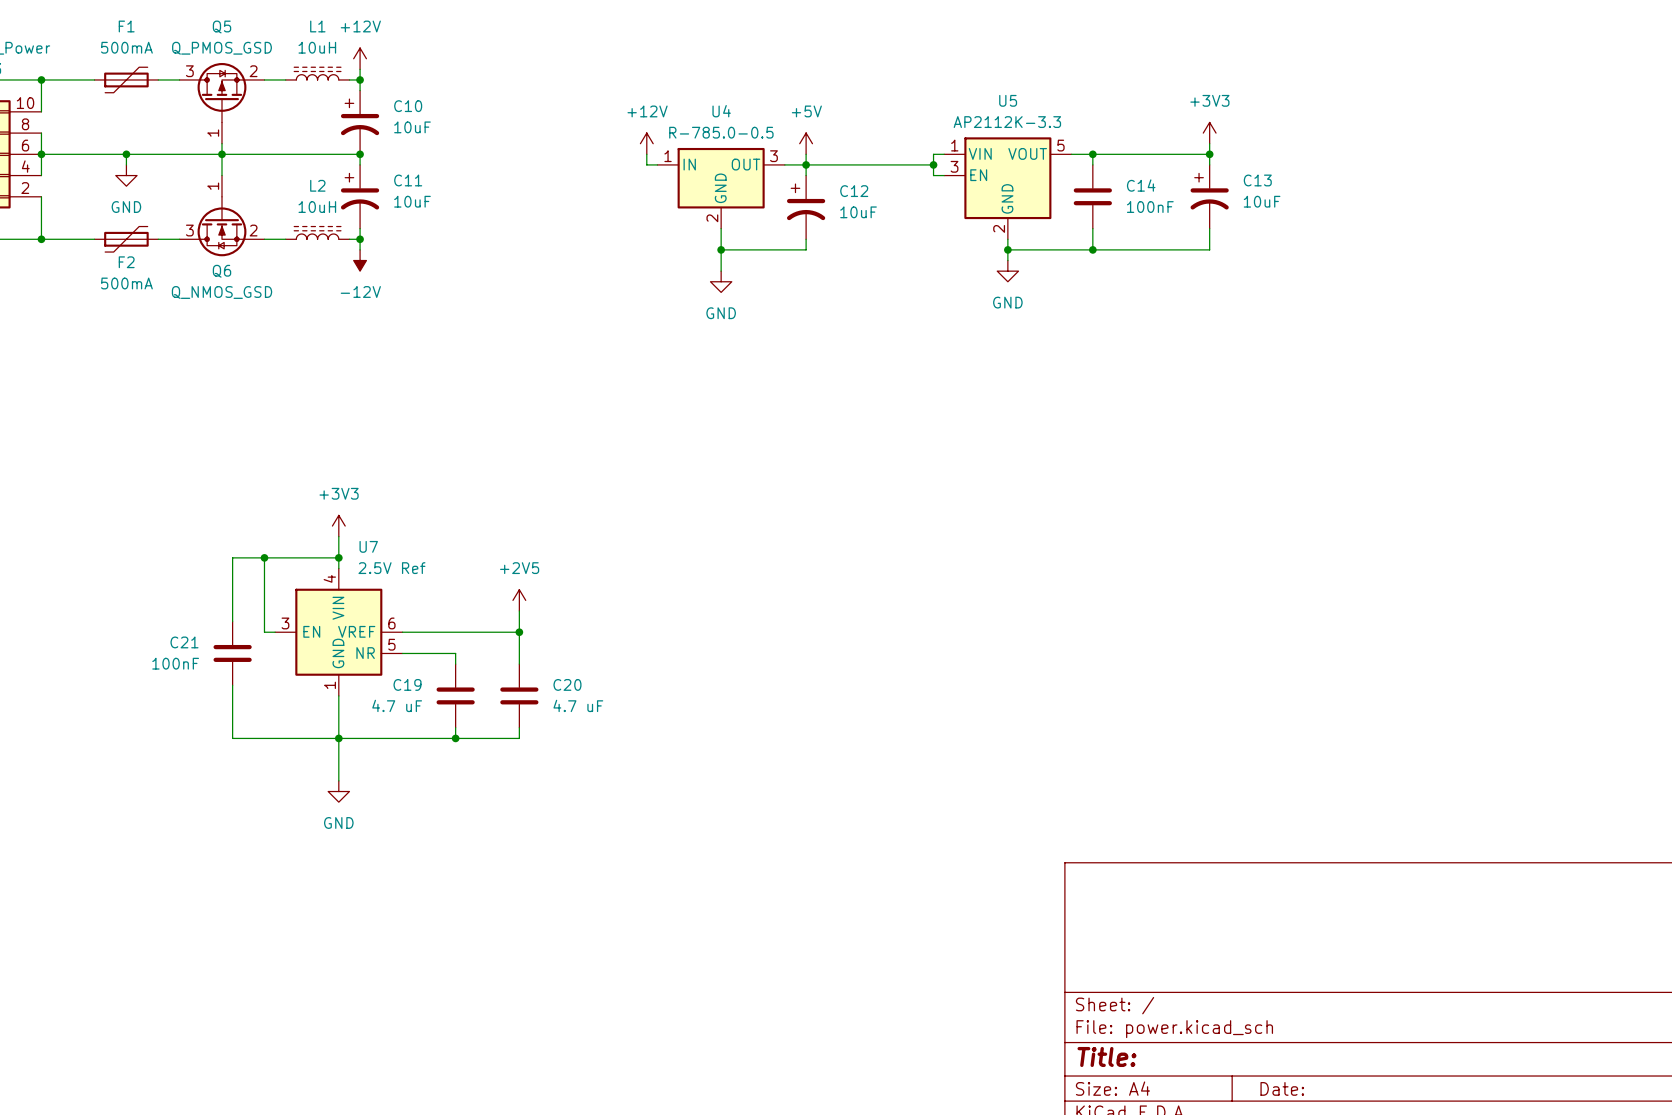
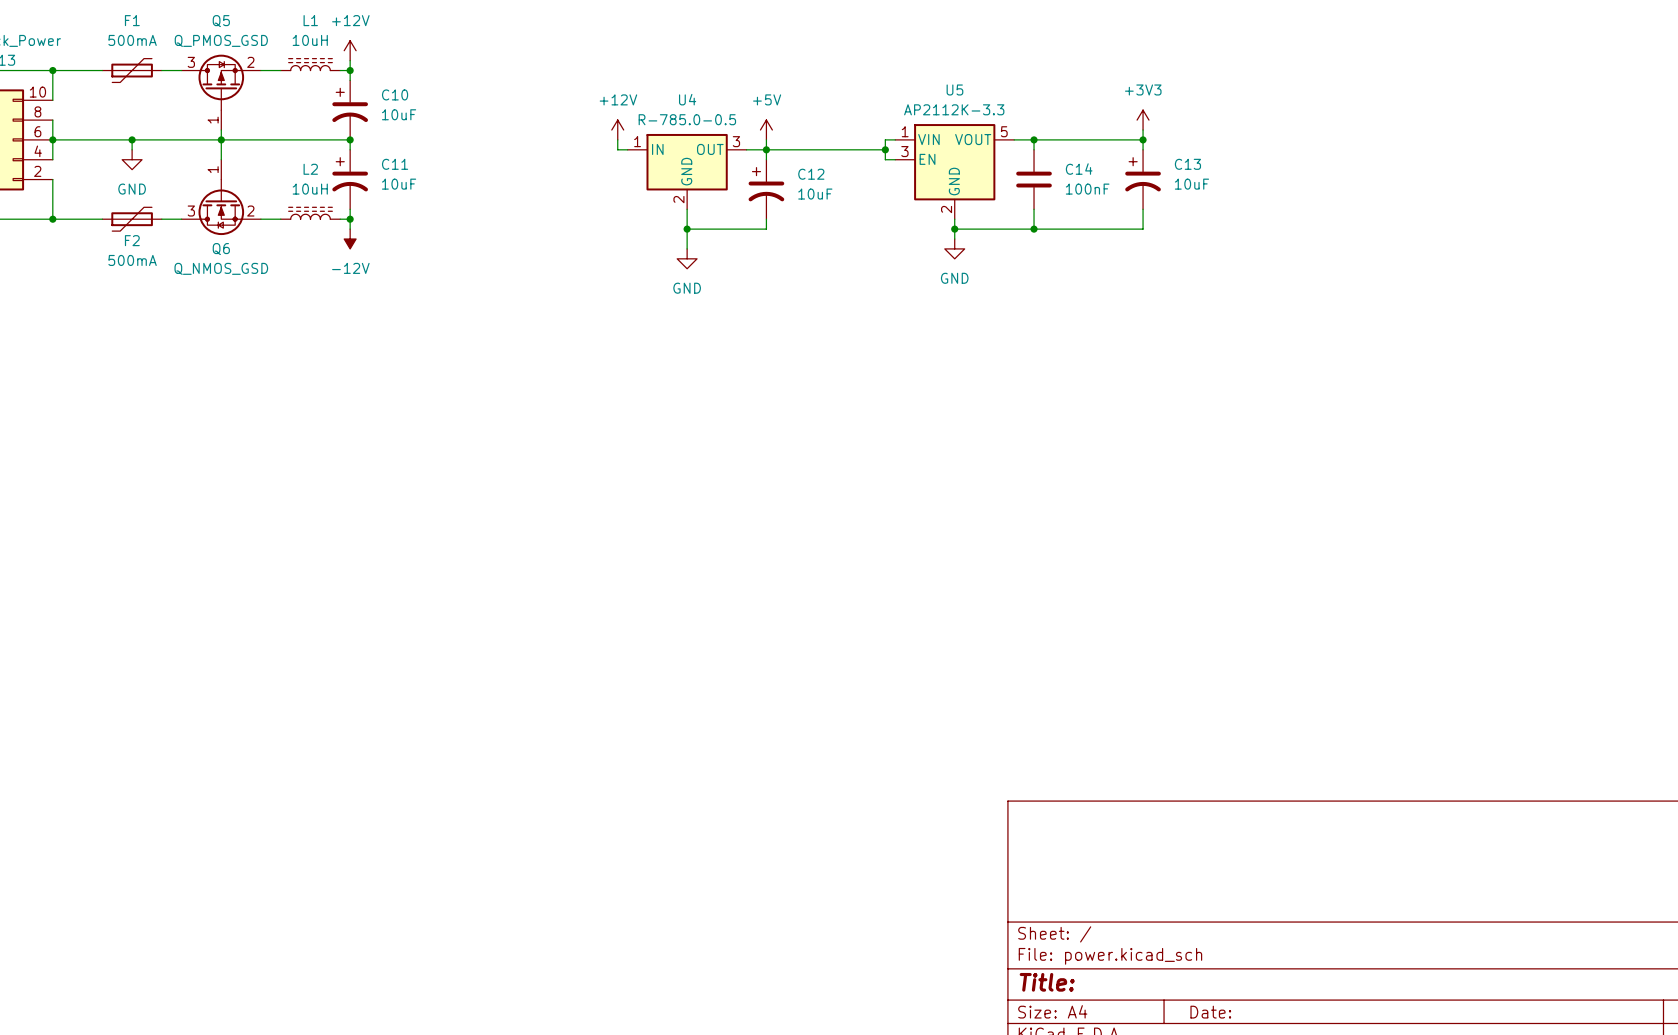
power symbol: +3V3 (338, 526) -> none
wire: (338, 536) (338, 568) -> none
wire: (264, 557) (264, 632) (275, 632) -> none
junction: (264, 557) -> none
wire: (338, 557) (232, 557) (232, 621) -> none
junction: (338, 557) -> none
power symbol: +2V5 (519, 600) -> none
wire: (519, 610) (519, 664) -> none
U7: 2.5V Ref (338, 632) -> none
wire: (402, 632) (519, 632) -> none
junction: (519, 632) -> none
C21: 100nF (232, 653) -> none
wire: (402, 653) (455, 653) (455, 664) -> none
wire: (232, 685) (232, 738) (519, 738) (519, 727) -> none
wire: (338, 695) (338, 780) -> none
C19: 4.7 uF (455, 695) -> none
C20: 4.7 uF (519, 695) -> none
wire: (455, 727) (455, 738) -> none
junction: (338, 738) -> none
junction: (455, 738) -> none
power symbol: GND (338, 791) -> none

